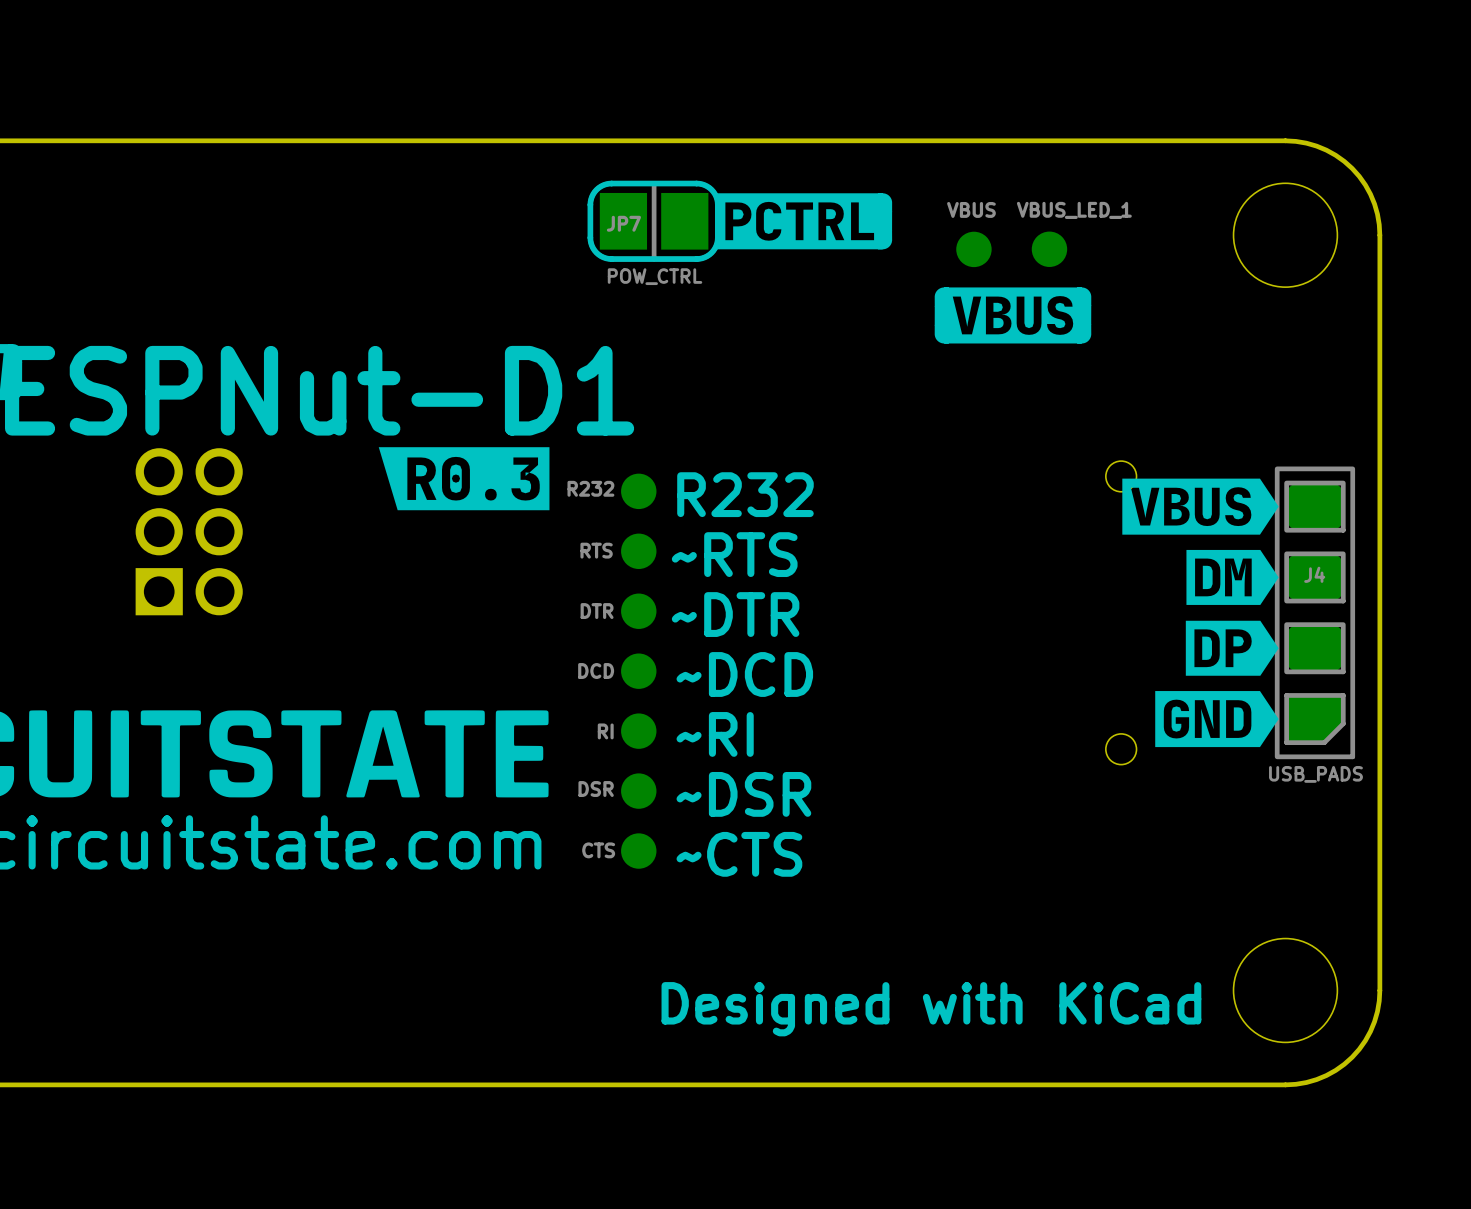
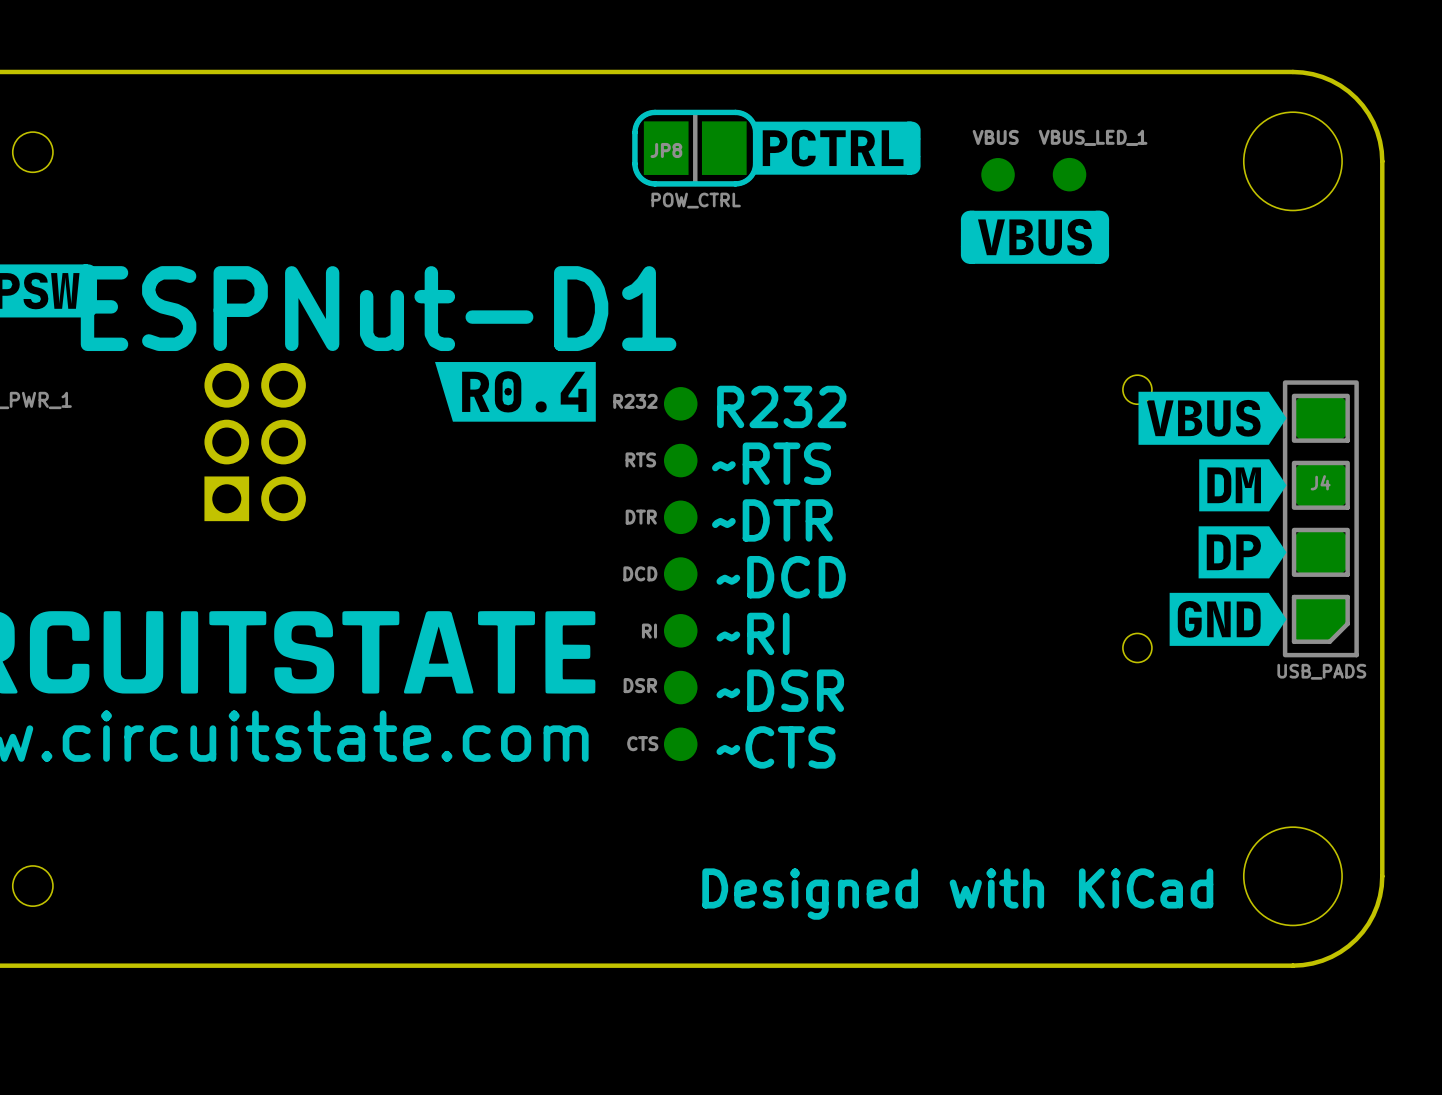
JP7 name: JP7 (623, 223) -> JP8 (666, 150)
drawing shape: [378, 447, 550, 511] -> [435, 362, 596, 422]

